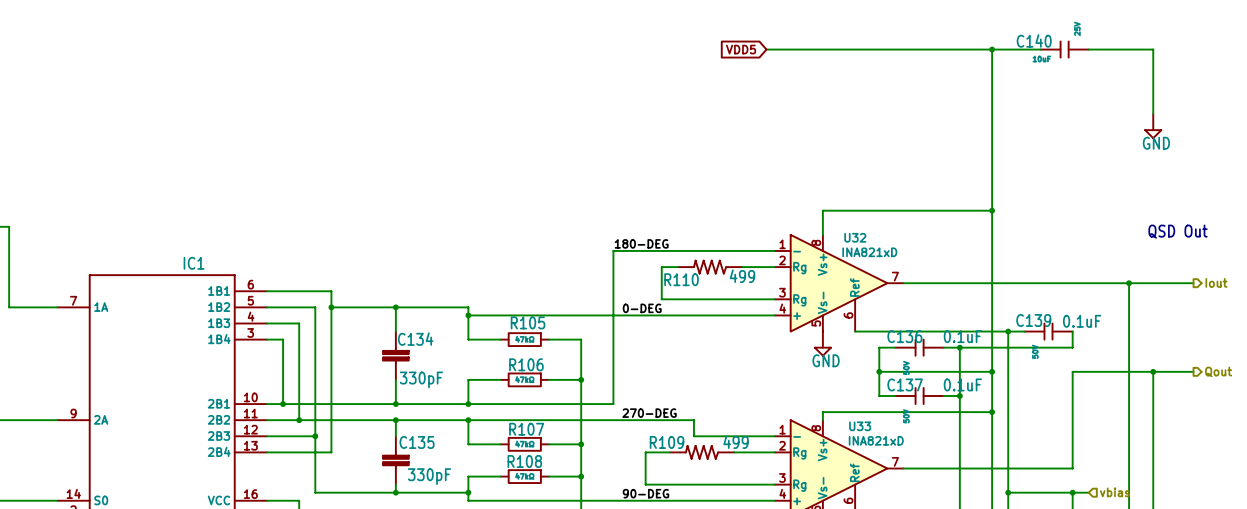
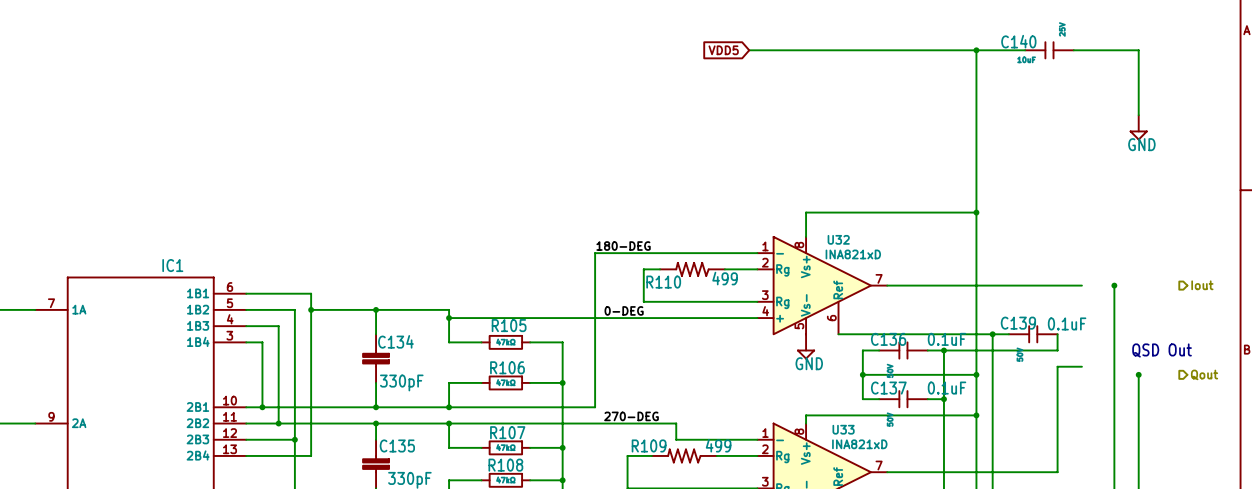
text position: QSD Out (1178, 231) -> QSD Out (1162, 350)
wire: (1096, 283) (1193, 283) -> none
wire: (1072, 371) (1193, 371) -> (1057, 374) (1057, 366) (1081, 366)

